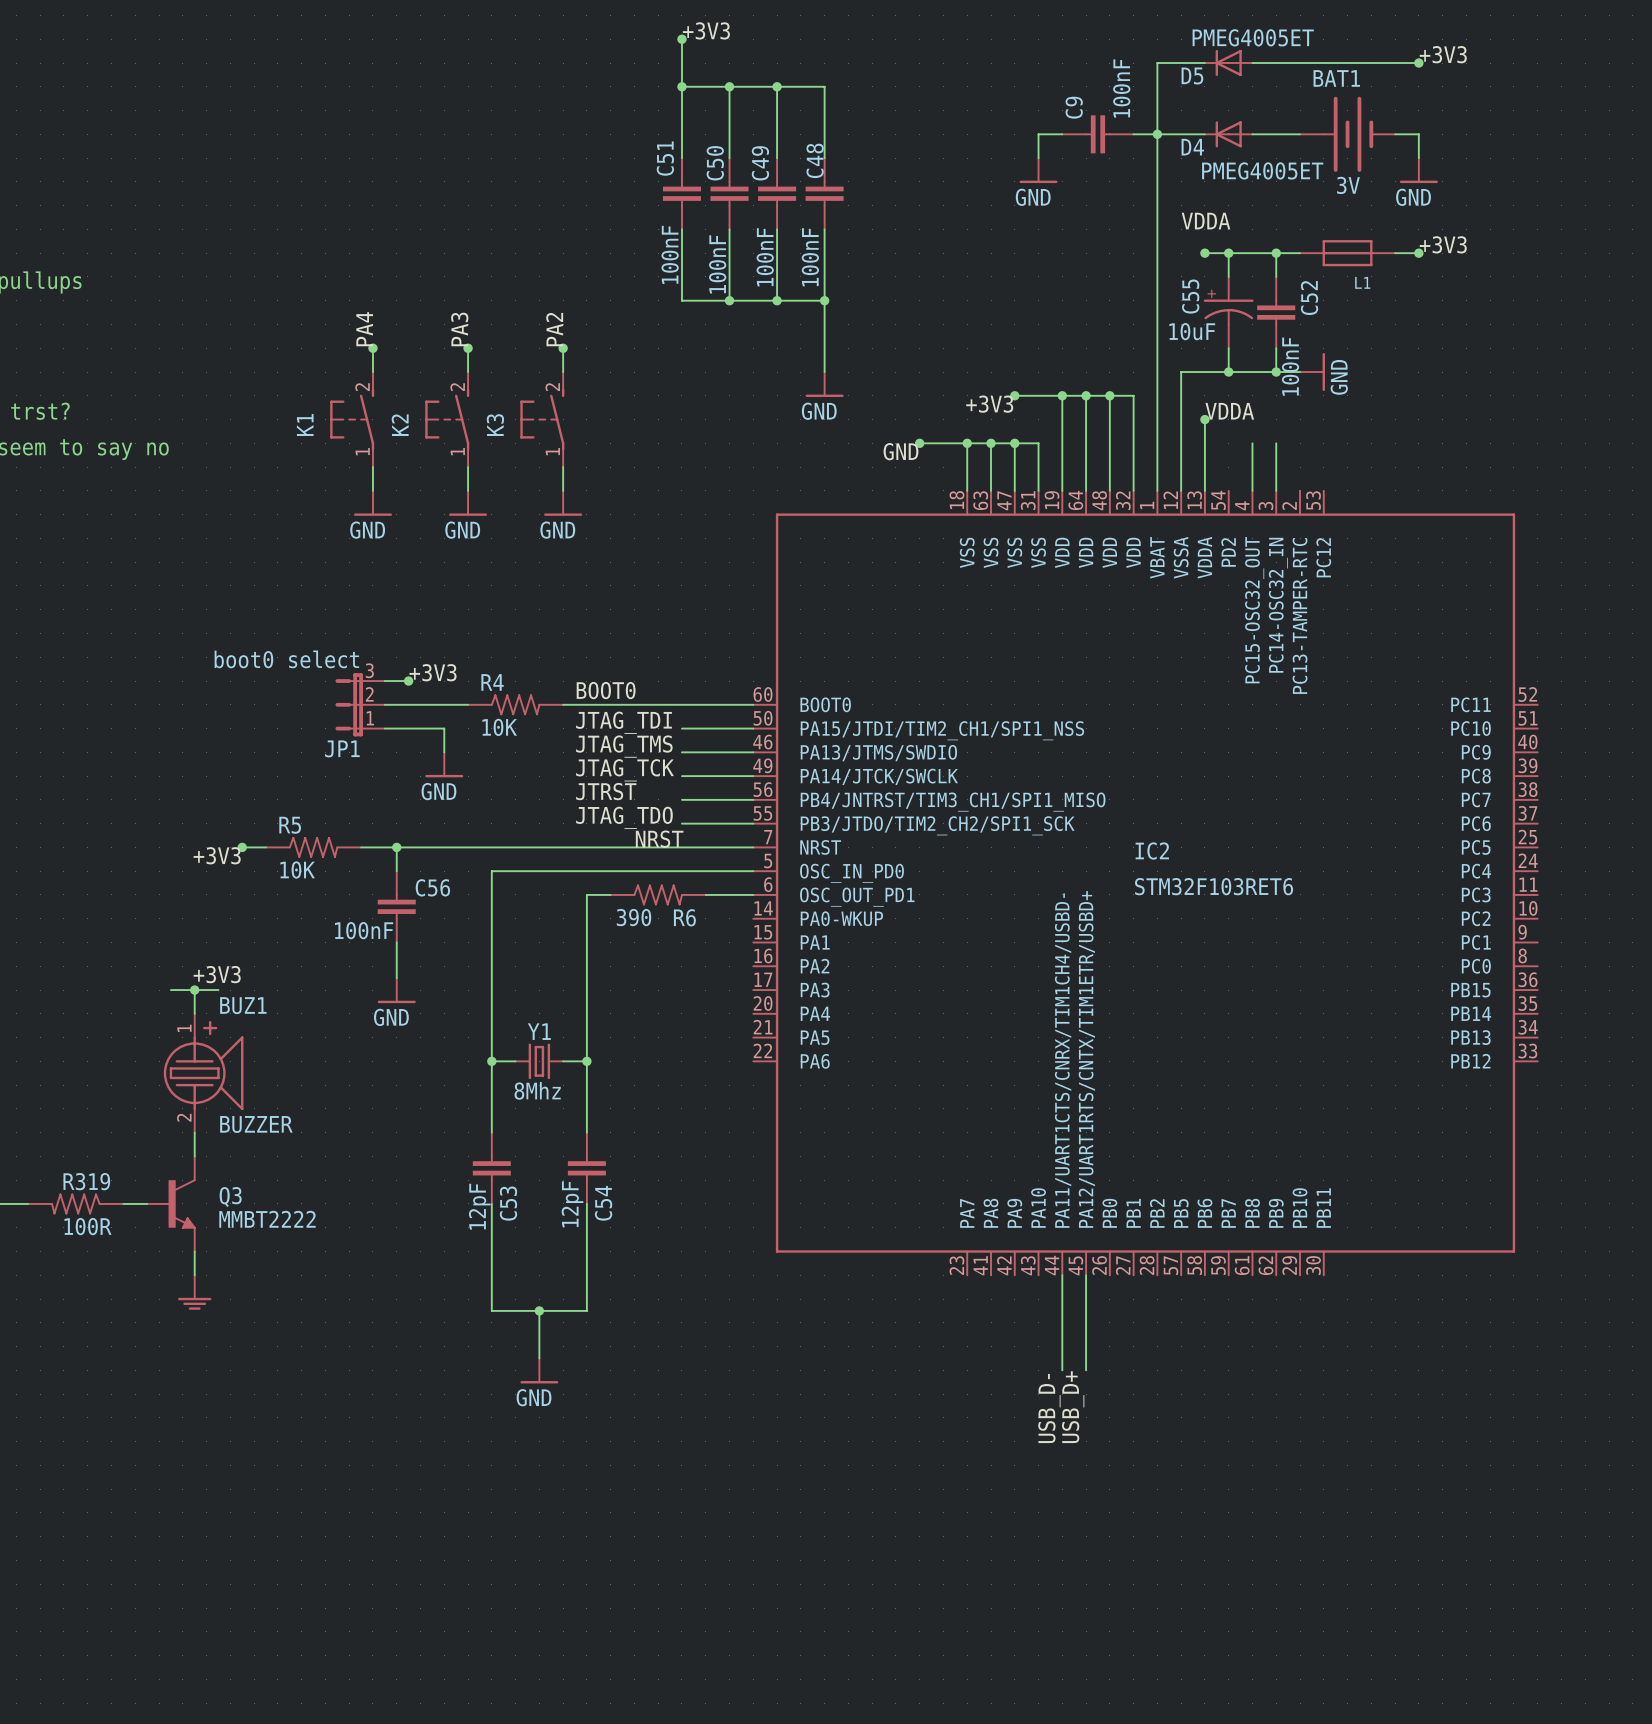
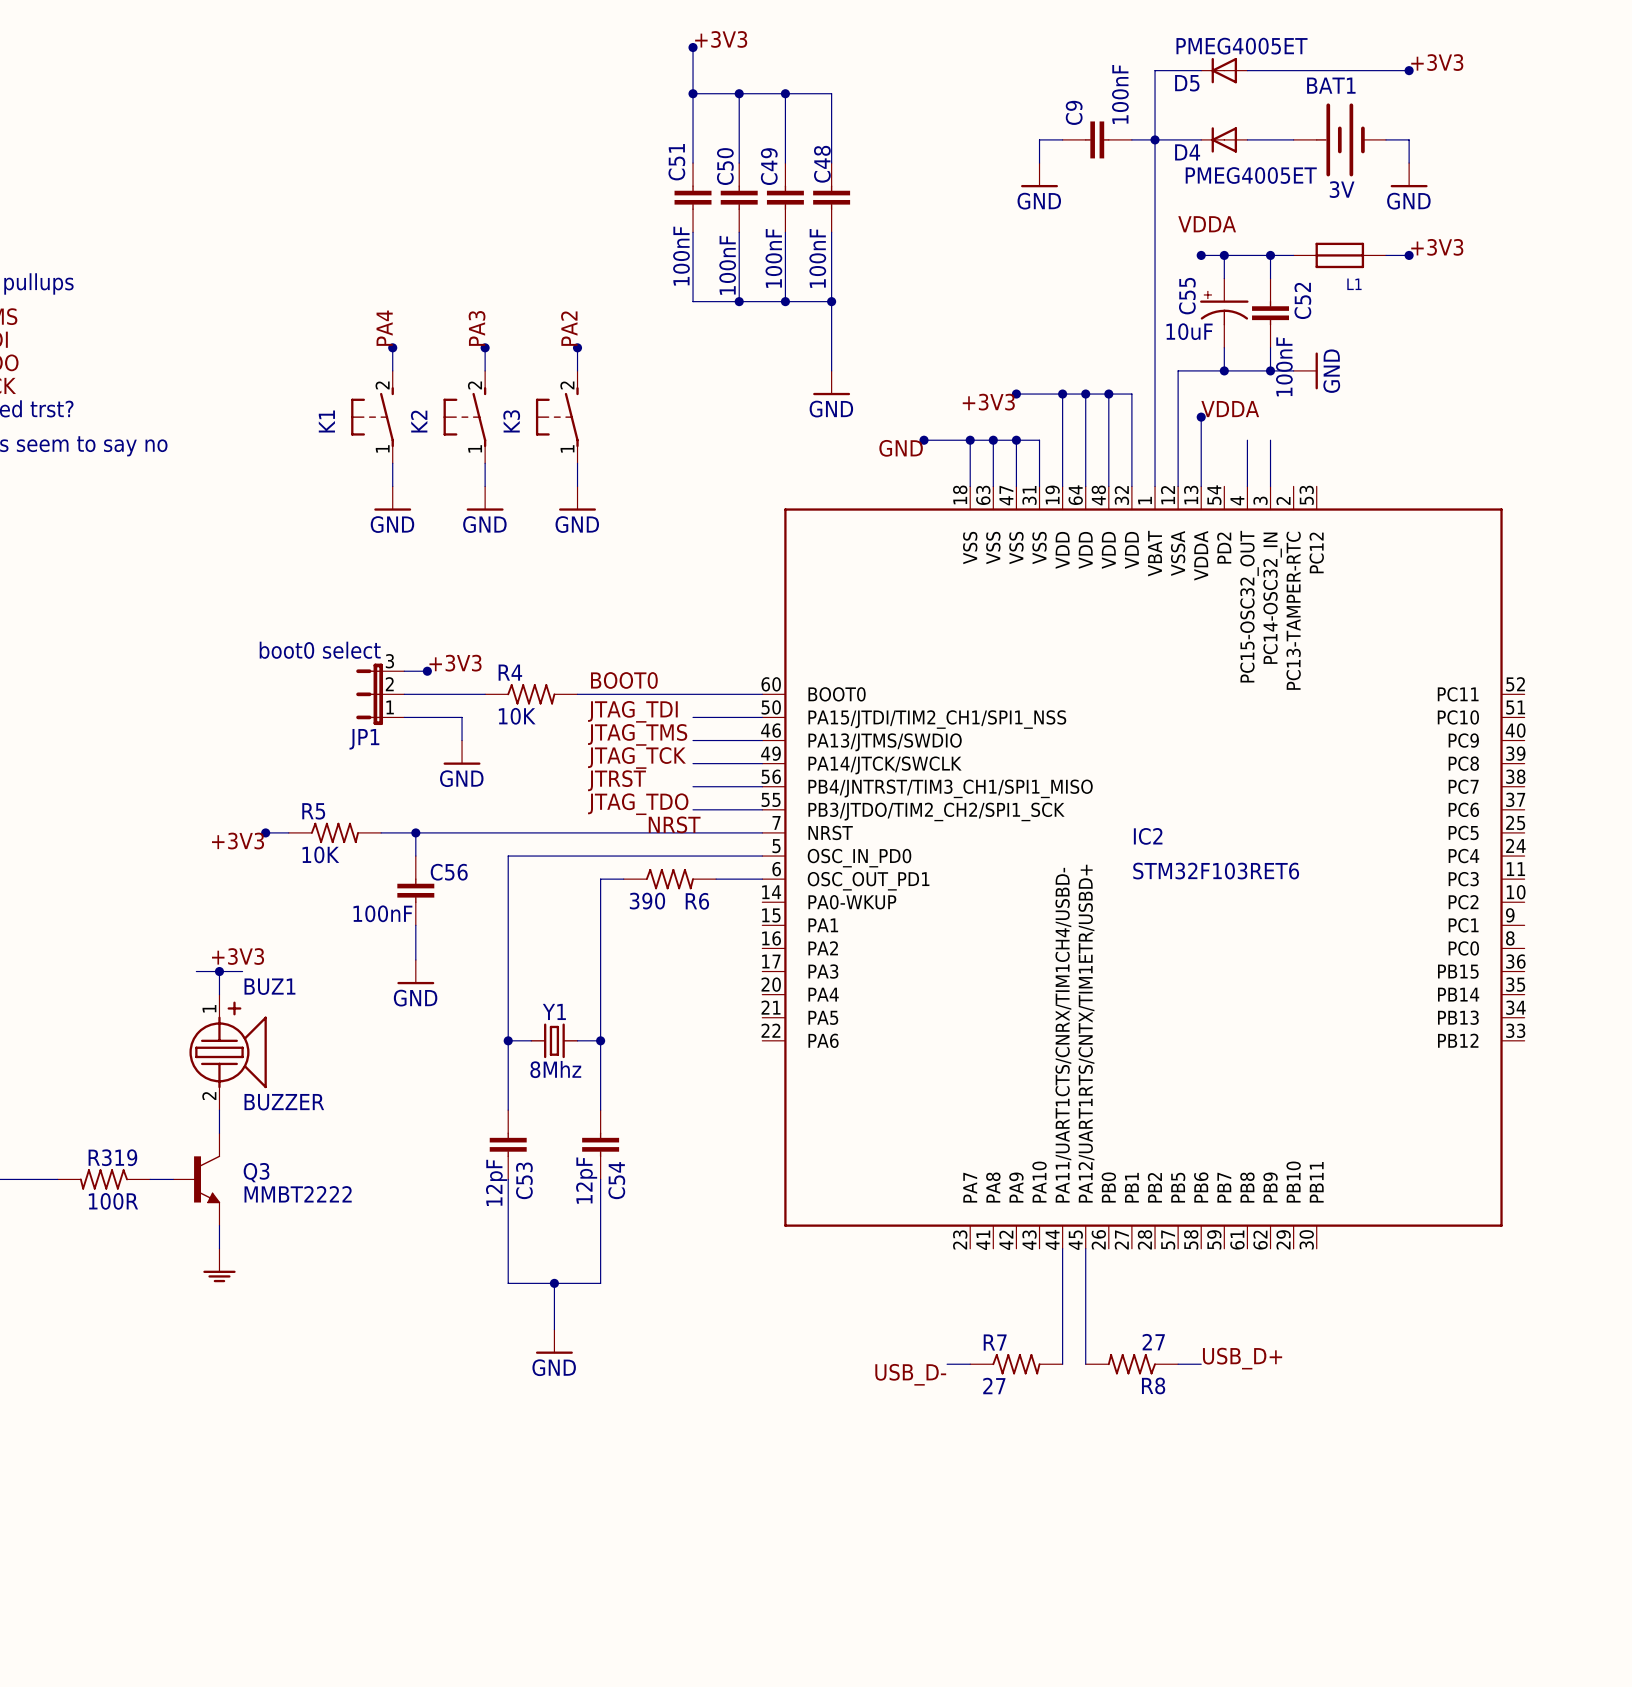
wire: none -> (1062, 1341) (1062, 1364)
wire: none -> (1085, 1341) (1085, 1364)
wire: none -> (947, 1364) (970, 1364)
R7: none -> 27 (1016, 1364)
R8: none -> 27 (1131, 1364)
wire: none -> (1178, 1364) (1201, 1364)
label rotation: 0° (1073, 1407) -> 90° clockwise (1242, 1358)
label position: USB_D+ (1073, 1407) -> USB_D+ (1242, 1358)
label rotation: 0° (1049, 1408) -> 90° clockwise (910, 1374)
label position: USB_D- (1049, 1408) -> USB_D- (910, 1374)

